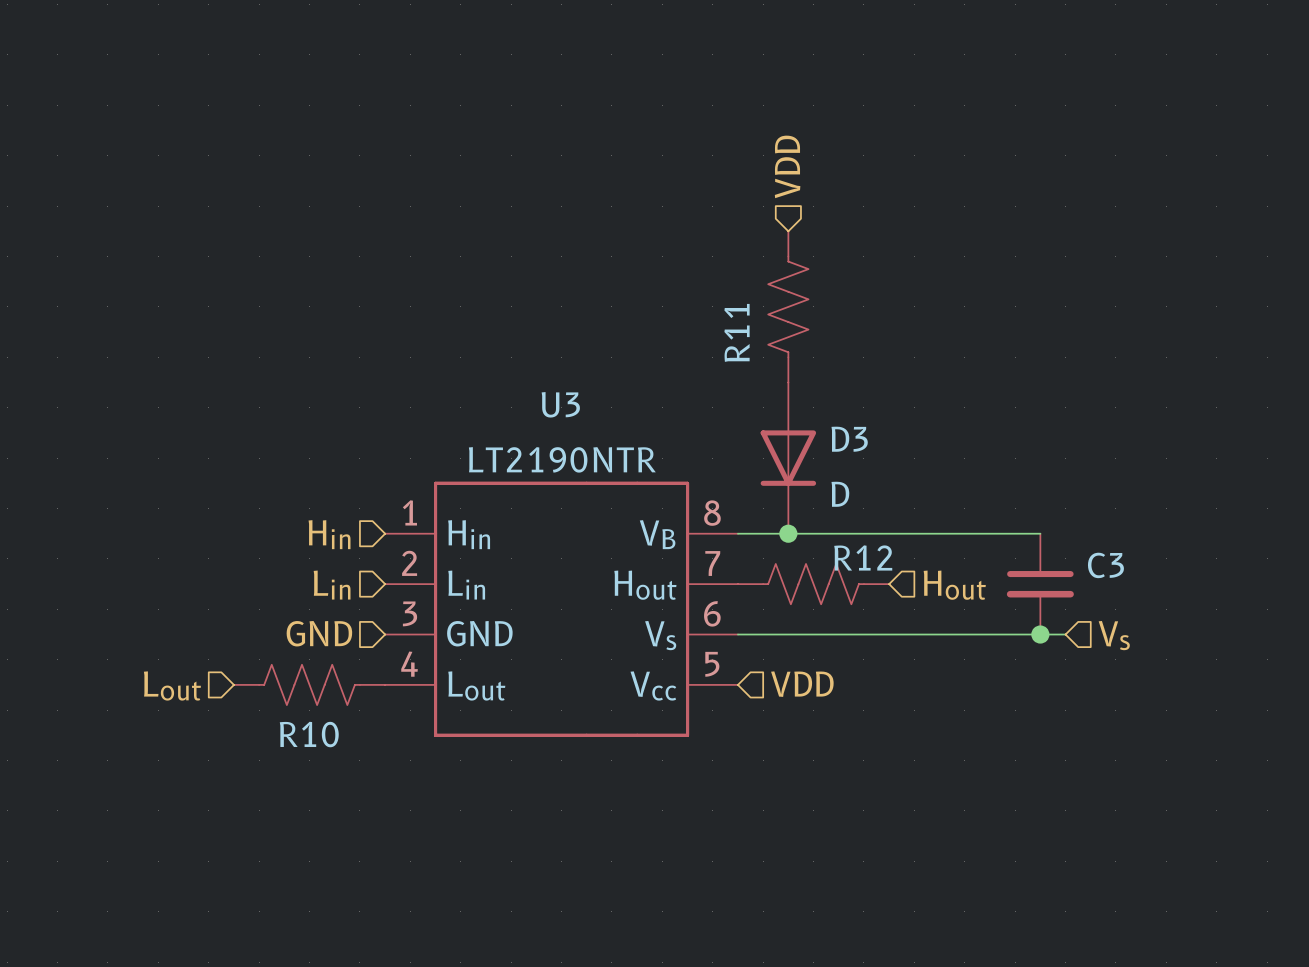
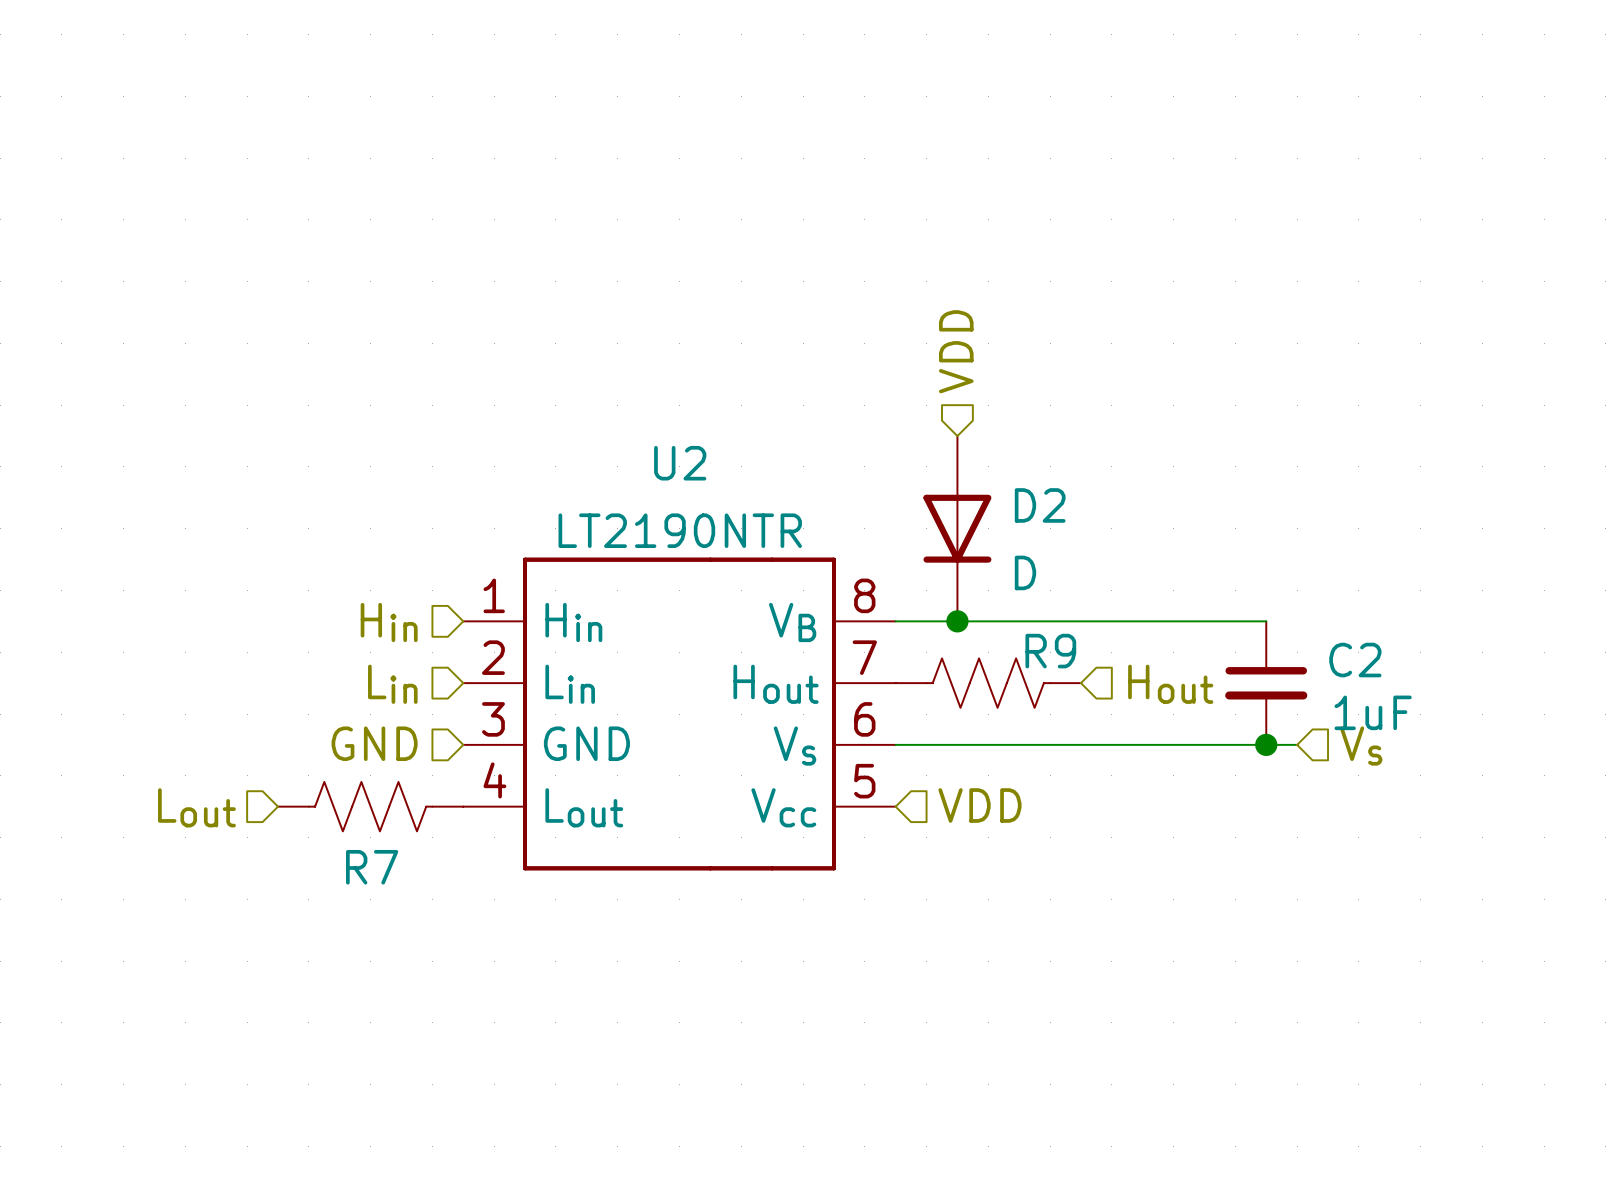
hierarchical label position: VDD (787, 166) -> VDD (956, 351)
R11: (788, 306) -> none
U3 name: U3 (560, 404) -> U2 (680, 463)
D3 name: D3 (849, 439) -> D2 (1040, 505)
R12 name: R12 (863, 557) -> R9 (1050, 651)
C3 name: C3 (1105, 565) -> C2 (1355, 660)
C3 value: none -> 1uF (1373, 712)
R10 name: R10 (309, 734) -> R7 (372, 867)

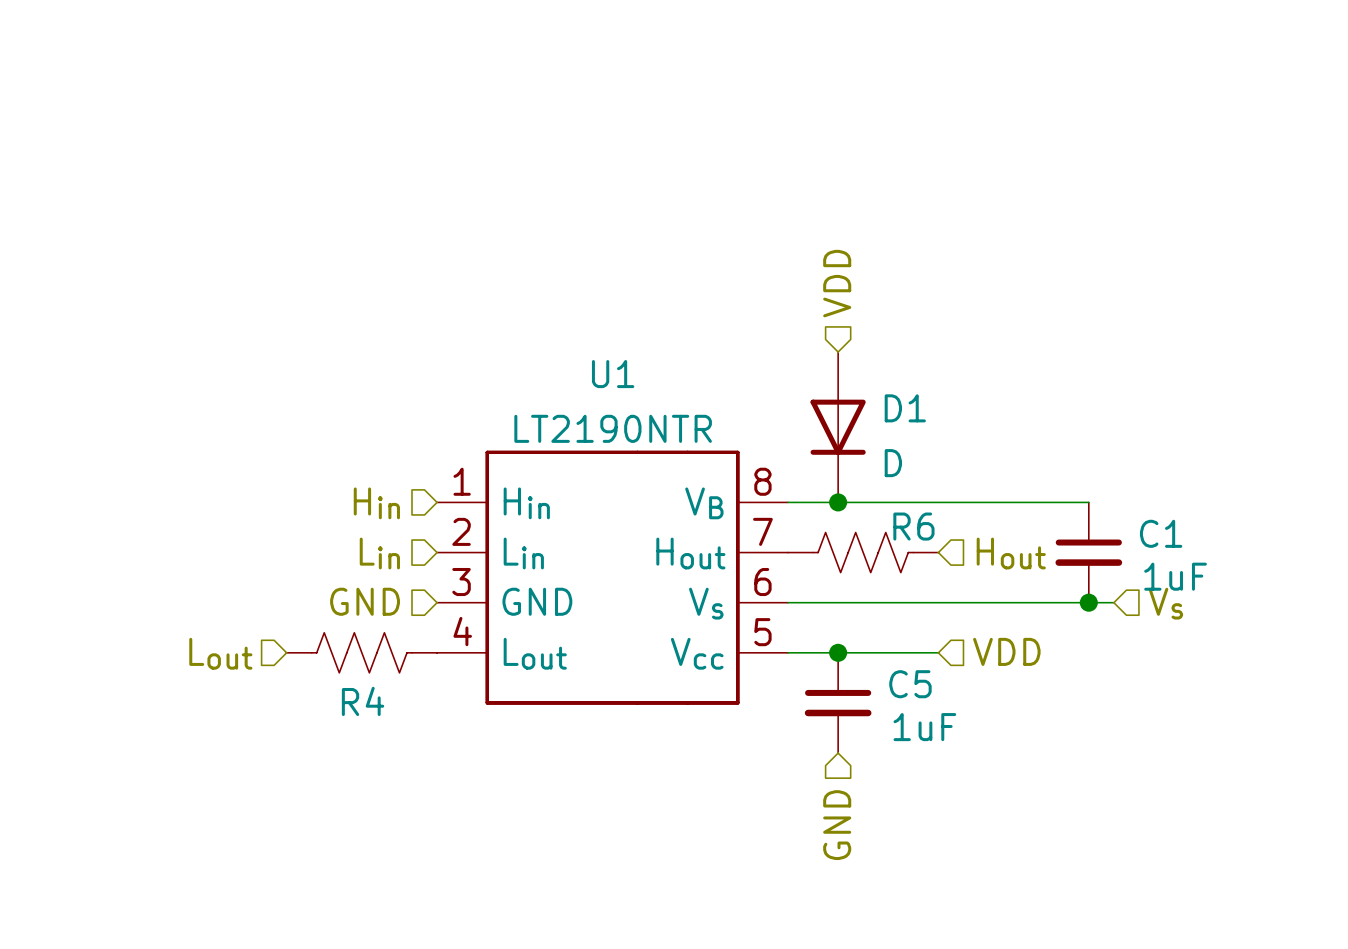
U2 name: U2 (680, 463) -> U1 (613, 374)
D2 name: D2 (1040, 505) -> D1 (905, 408)
R9 name: R9 (1050, 651) -> R6 (913, 526)
C2 name: C2 (1355, 660) -> C1 (1161, 533)
hierarchical label position: VDD (979, 805) -> VDD (1006, 651)
wire: none -> (788, 652) (938, 652)
junction: none -> (838, 652)
R7 name: R7 (372, 867) -> R4 (363, 701)
C5: none -> 1uF (838, 702)
hierarchical label: none -> GND (837, 825)

